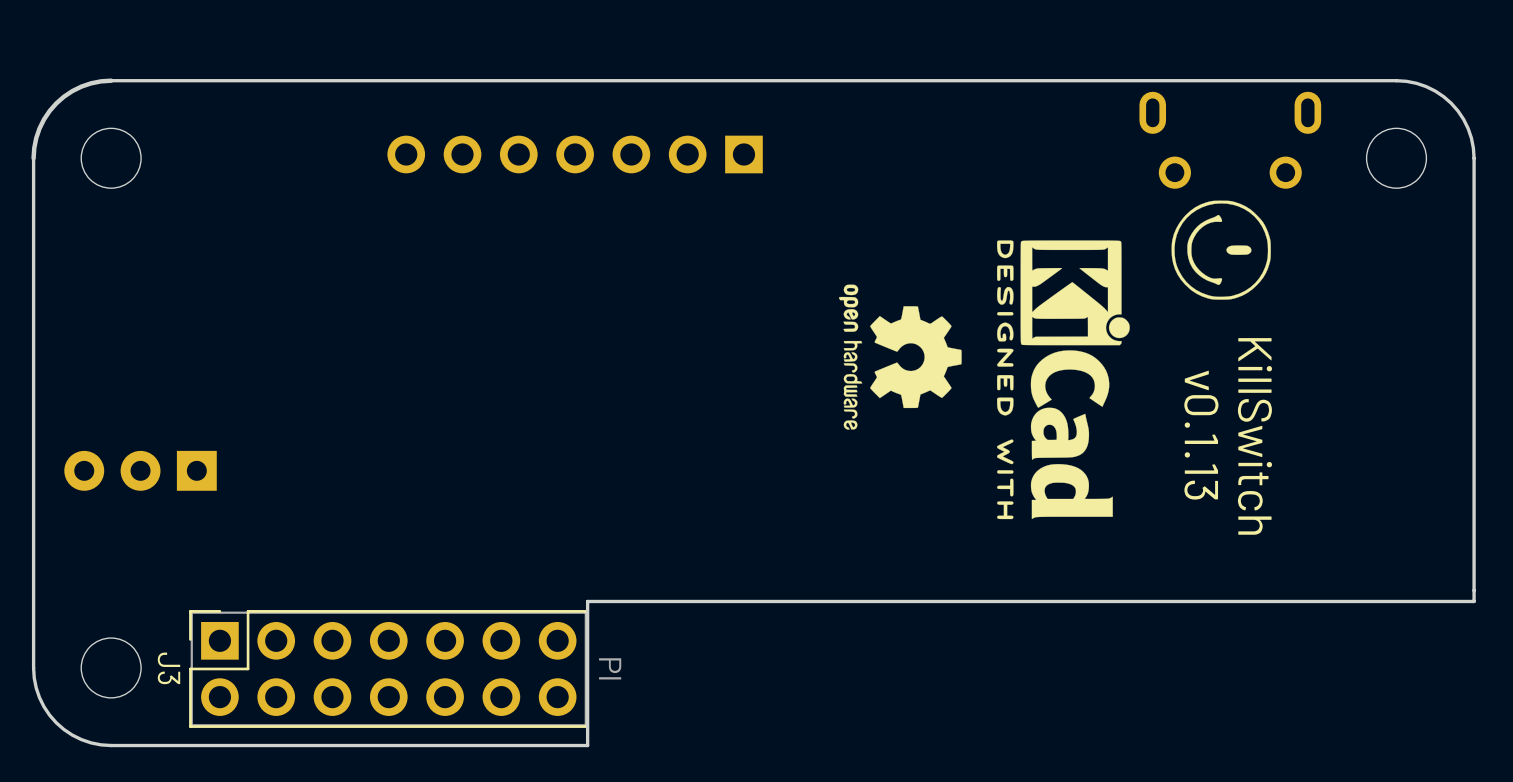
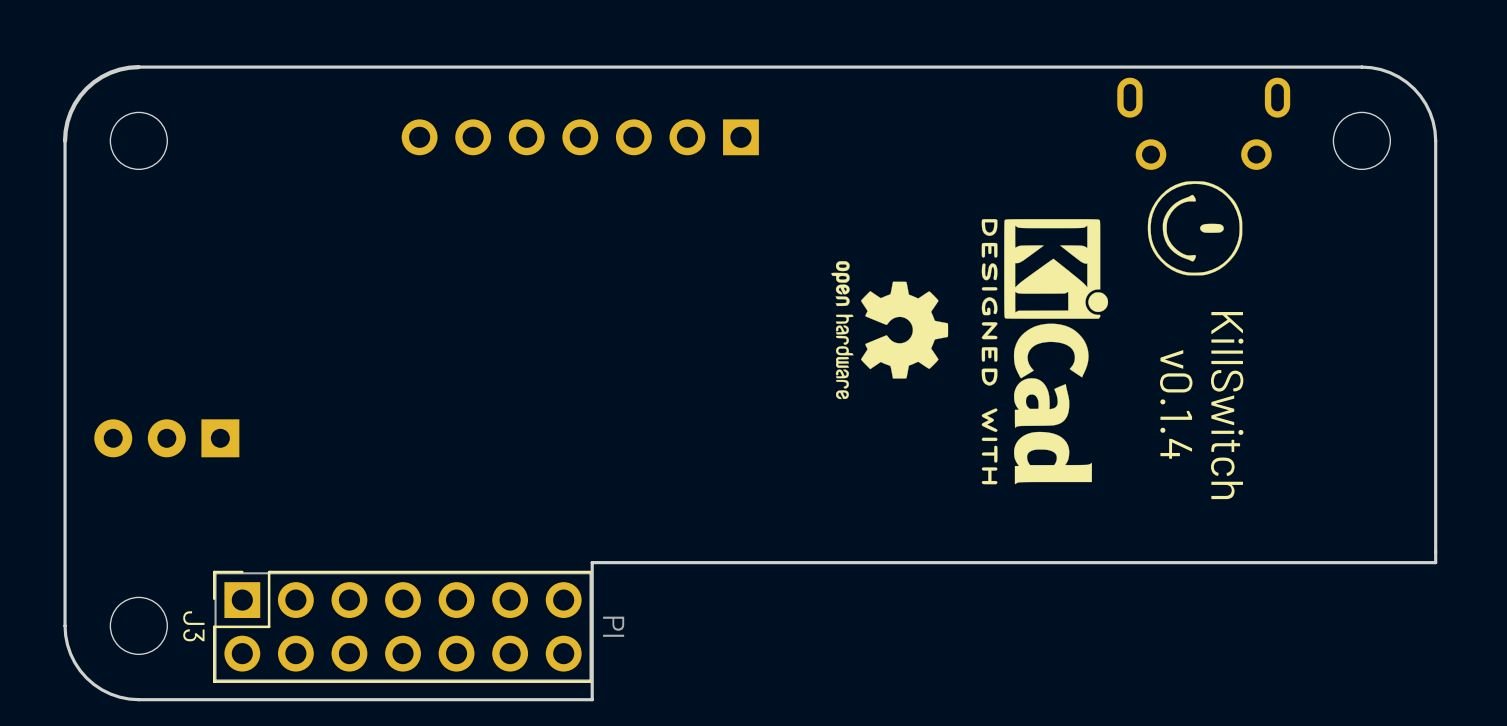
text: v0.1.13 (1201, 435) -> v0.1.4 (1176, 404)

